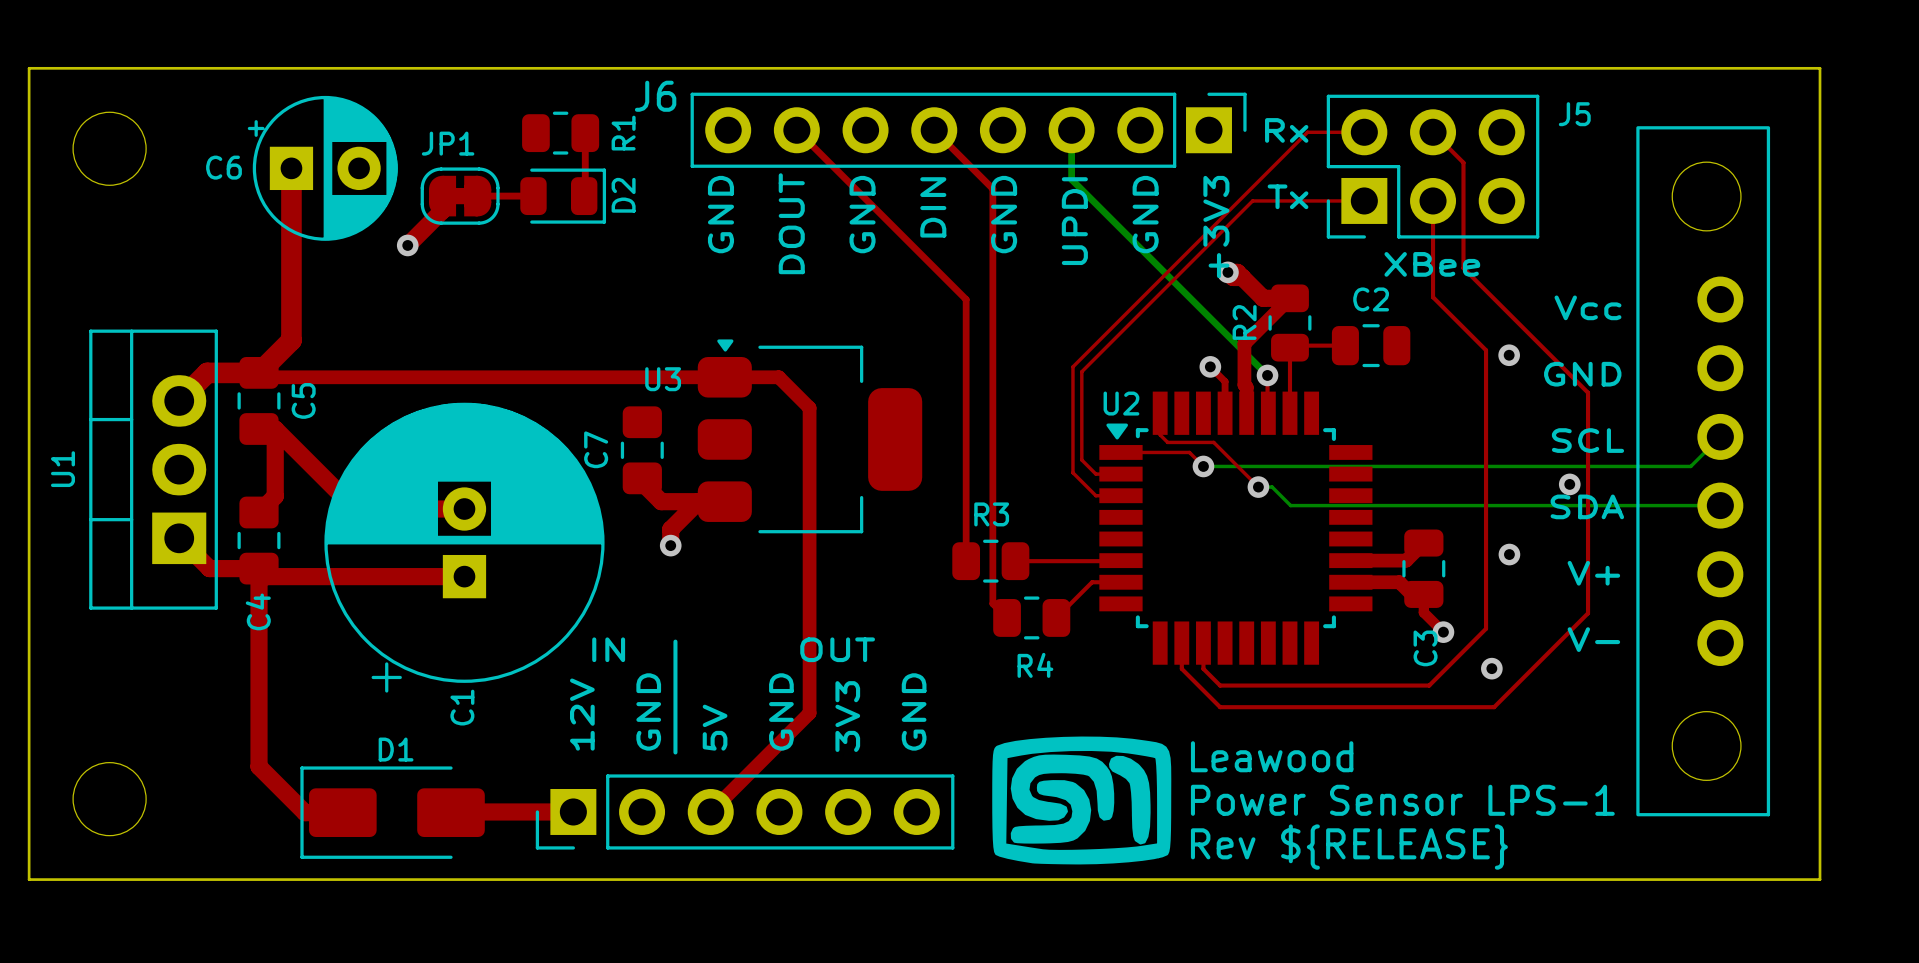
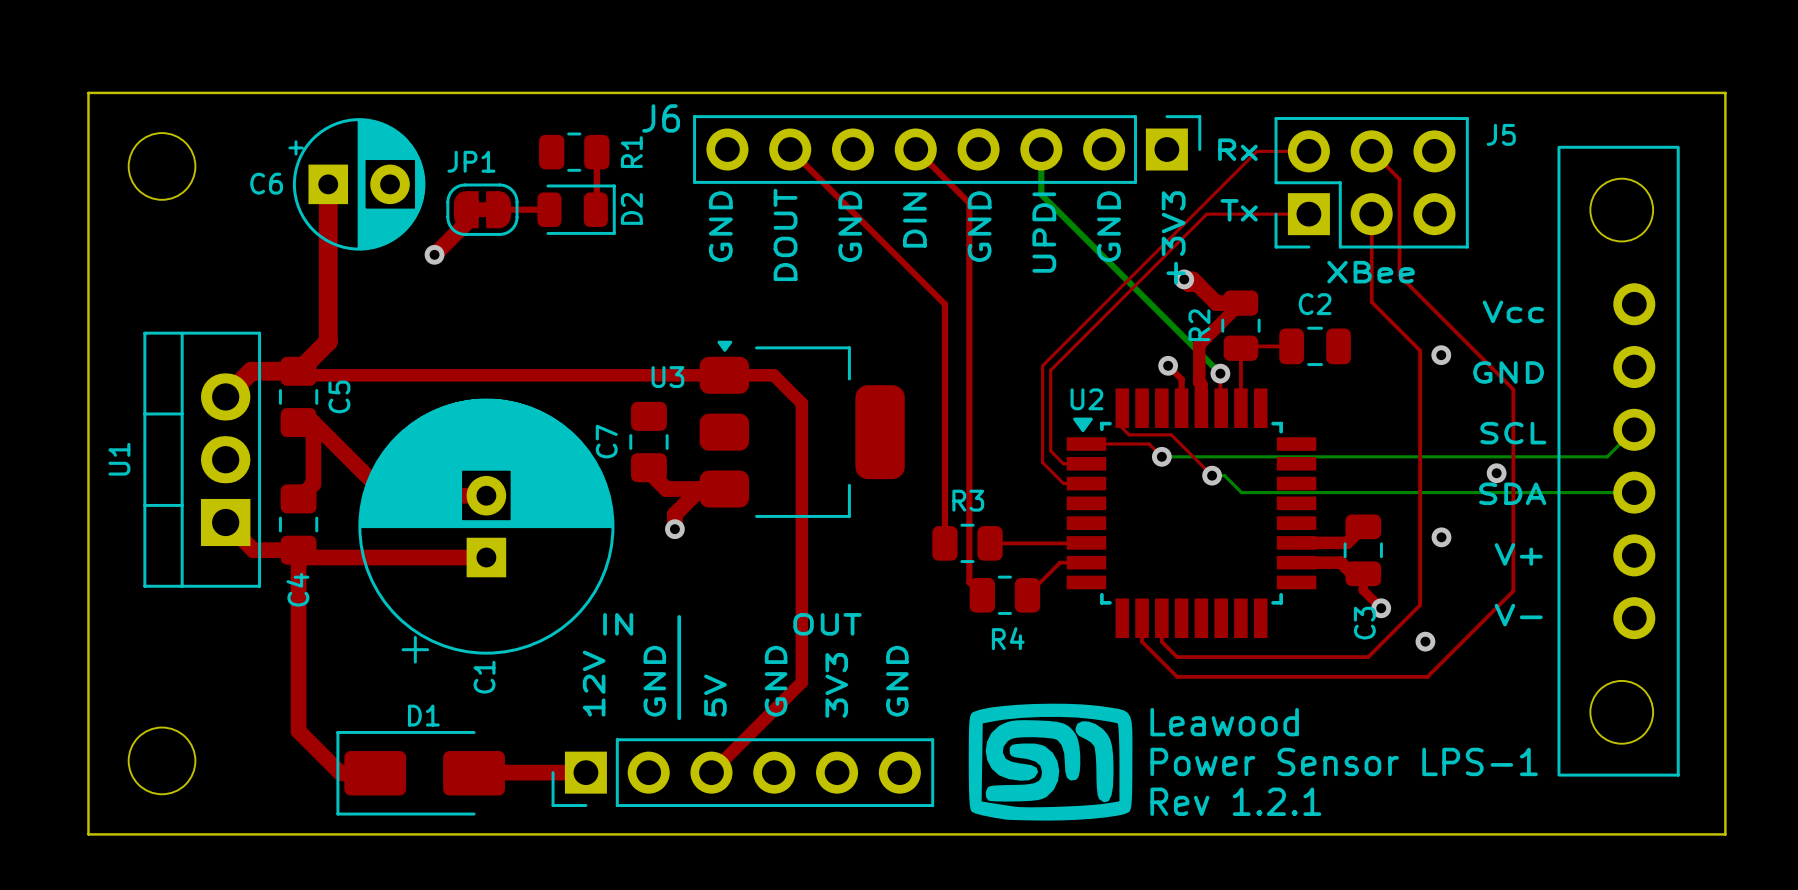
text: Rev ${RELEASE} (1349, 847) -> Rev 1.2.1 (1235, 801)

